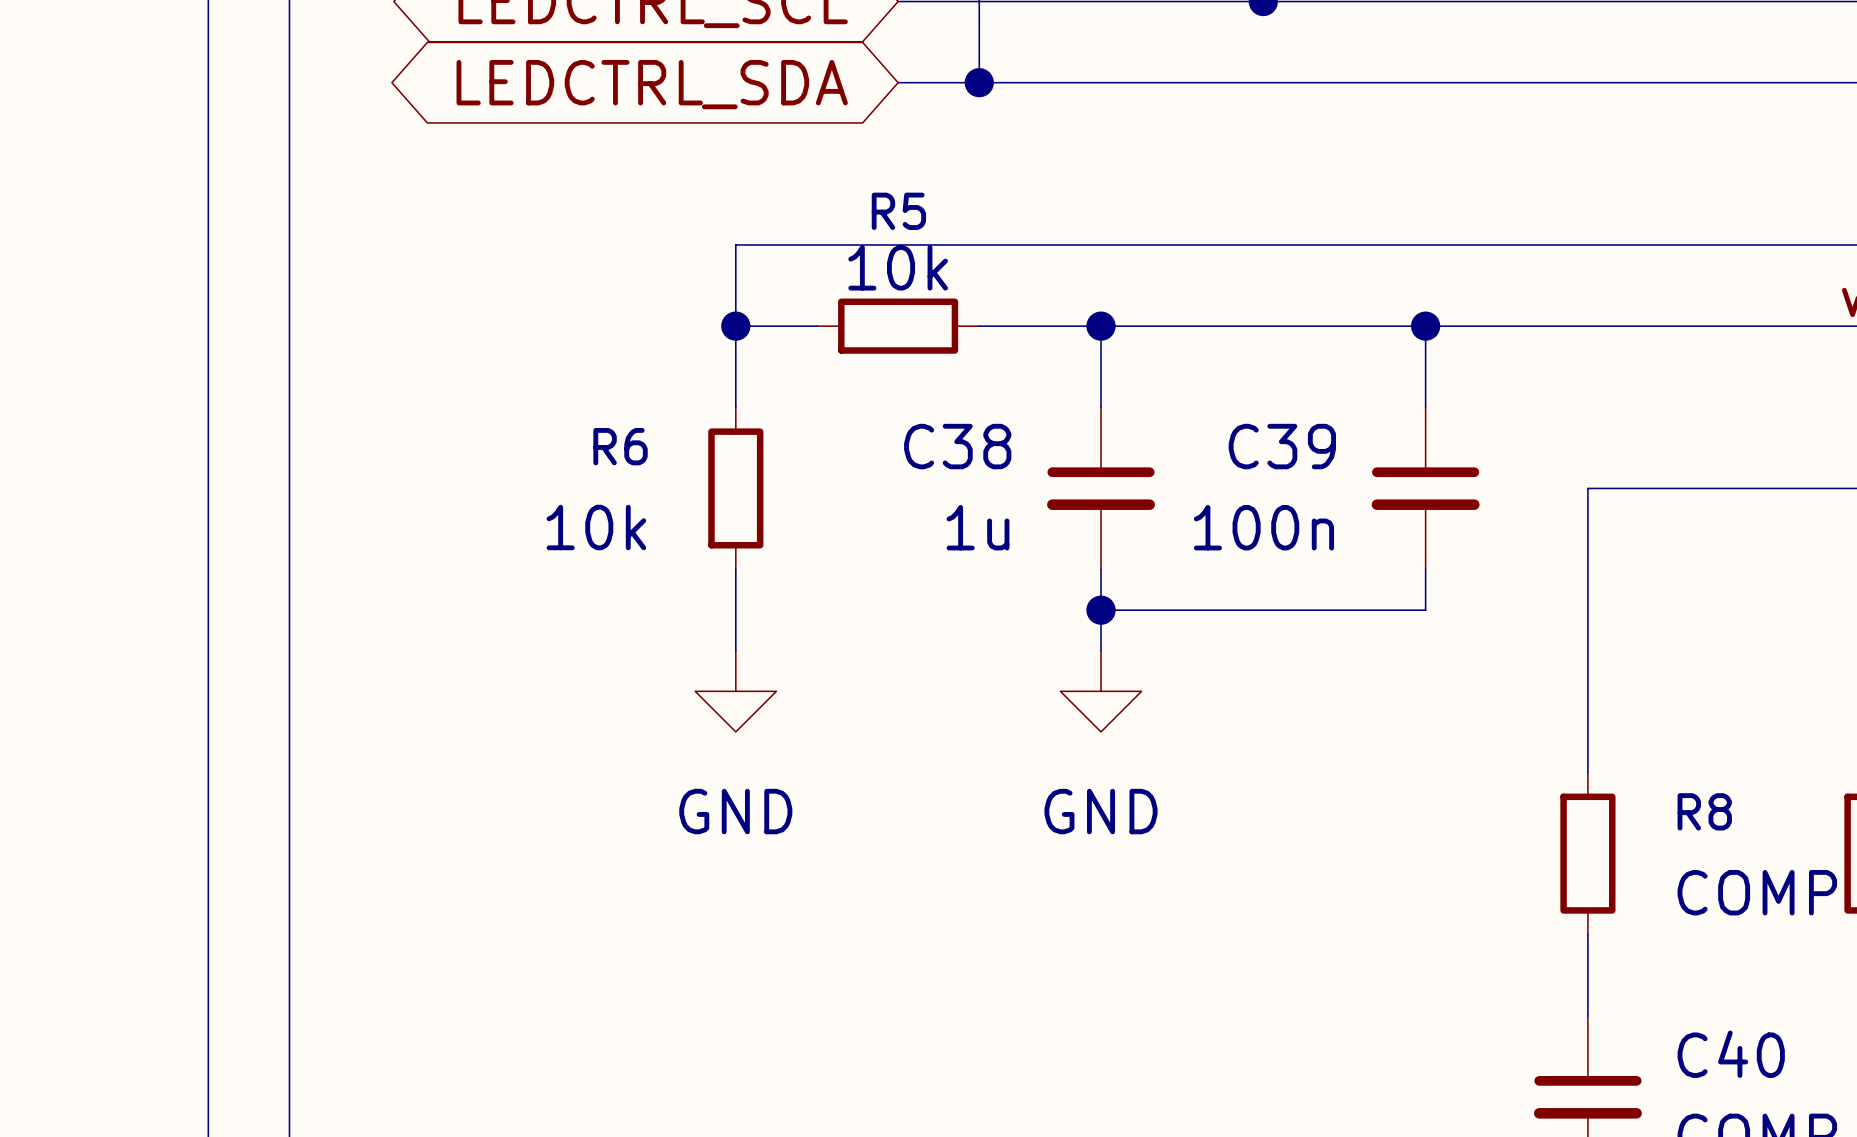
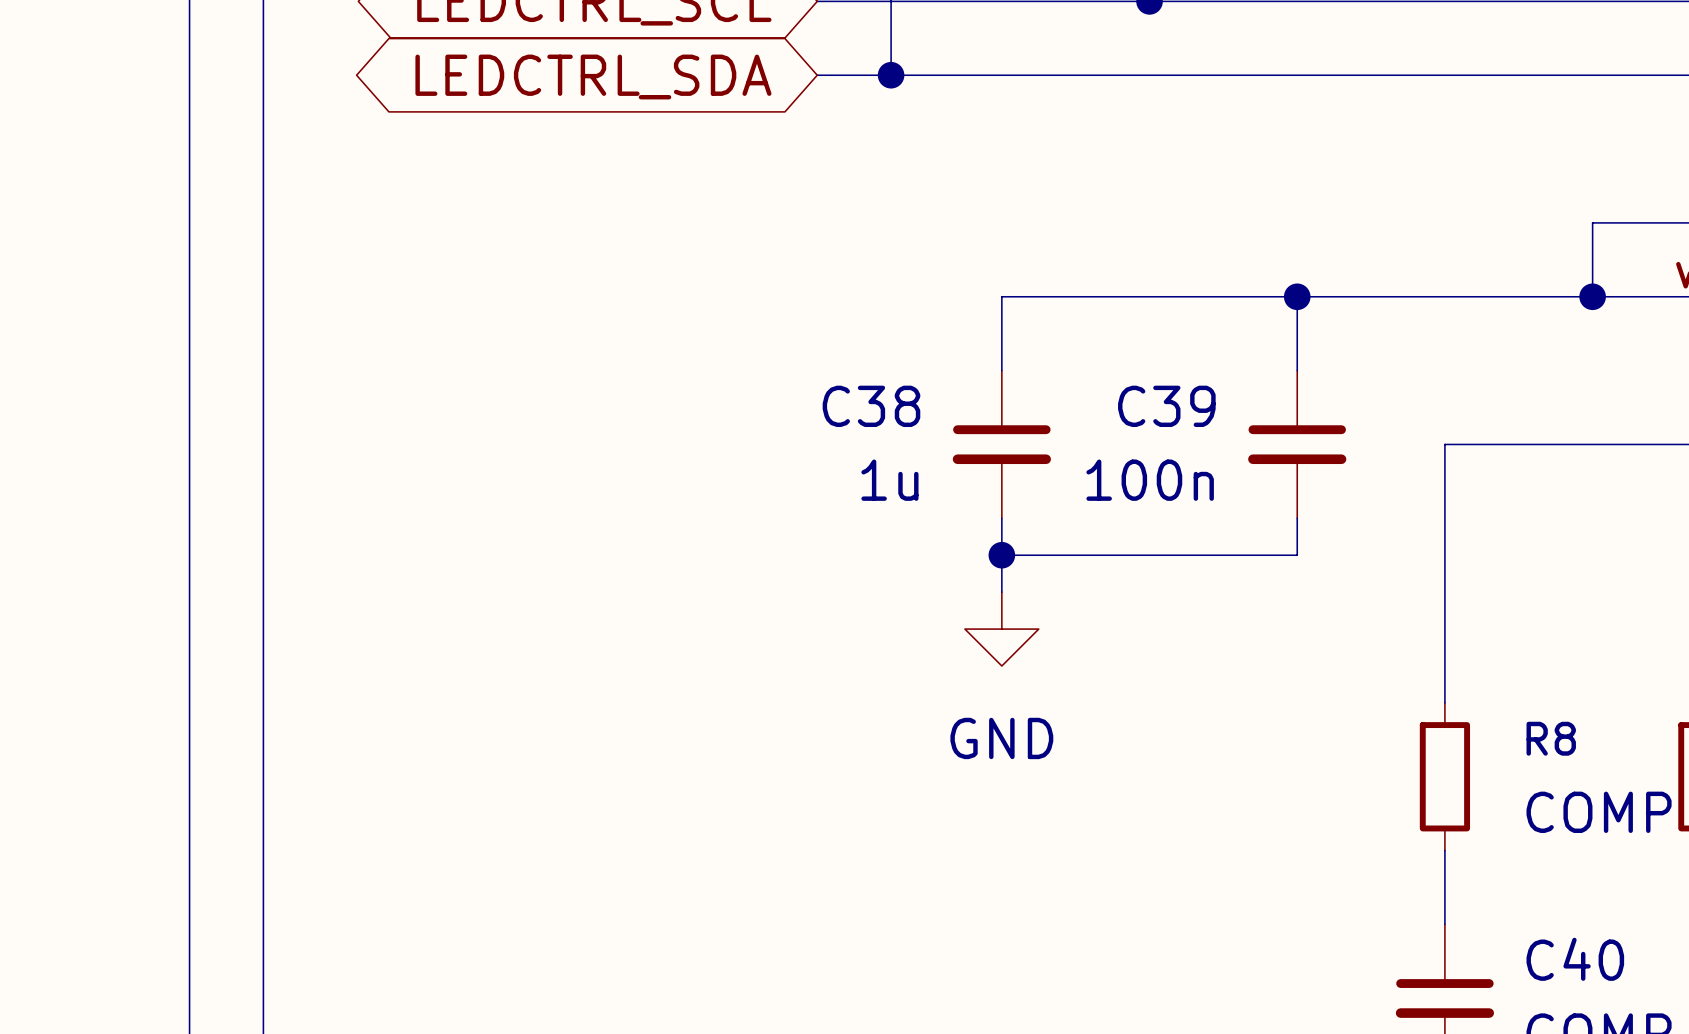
wire: (1750, 244) (735, 244) (735, 407) -> (1592, 222) (1592, 296)
wire: (735, 326) (816, 326) -> none
junction: (735, 326) -> none
R5: 10k (898, 326) -> none
wire: (979, 326) (1101, 326) -> none
junction: (1101, 326) -> none
junction: none -> (1592, 296)
R6: 10k (735, 488) -> none
wire: (735, 569) (735, 650) -> none
power symbol: GND (735, 691) -> none

